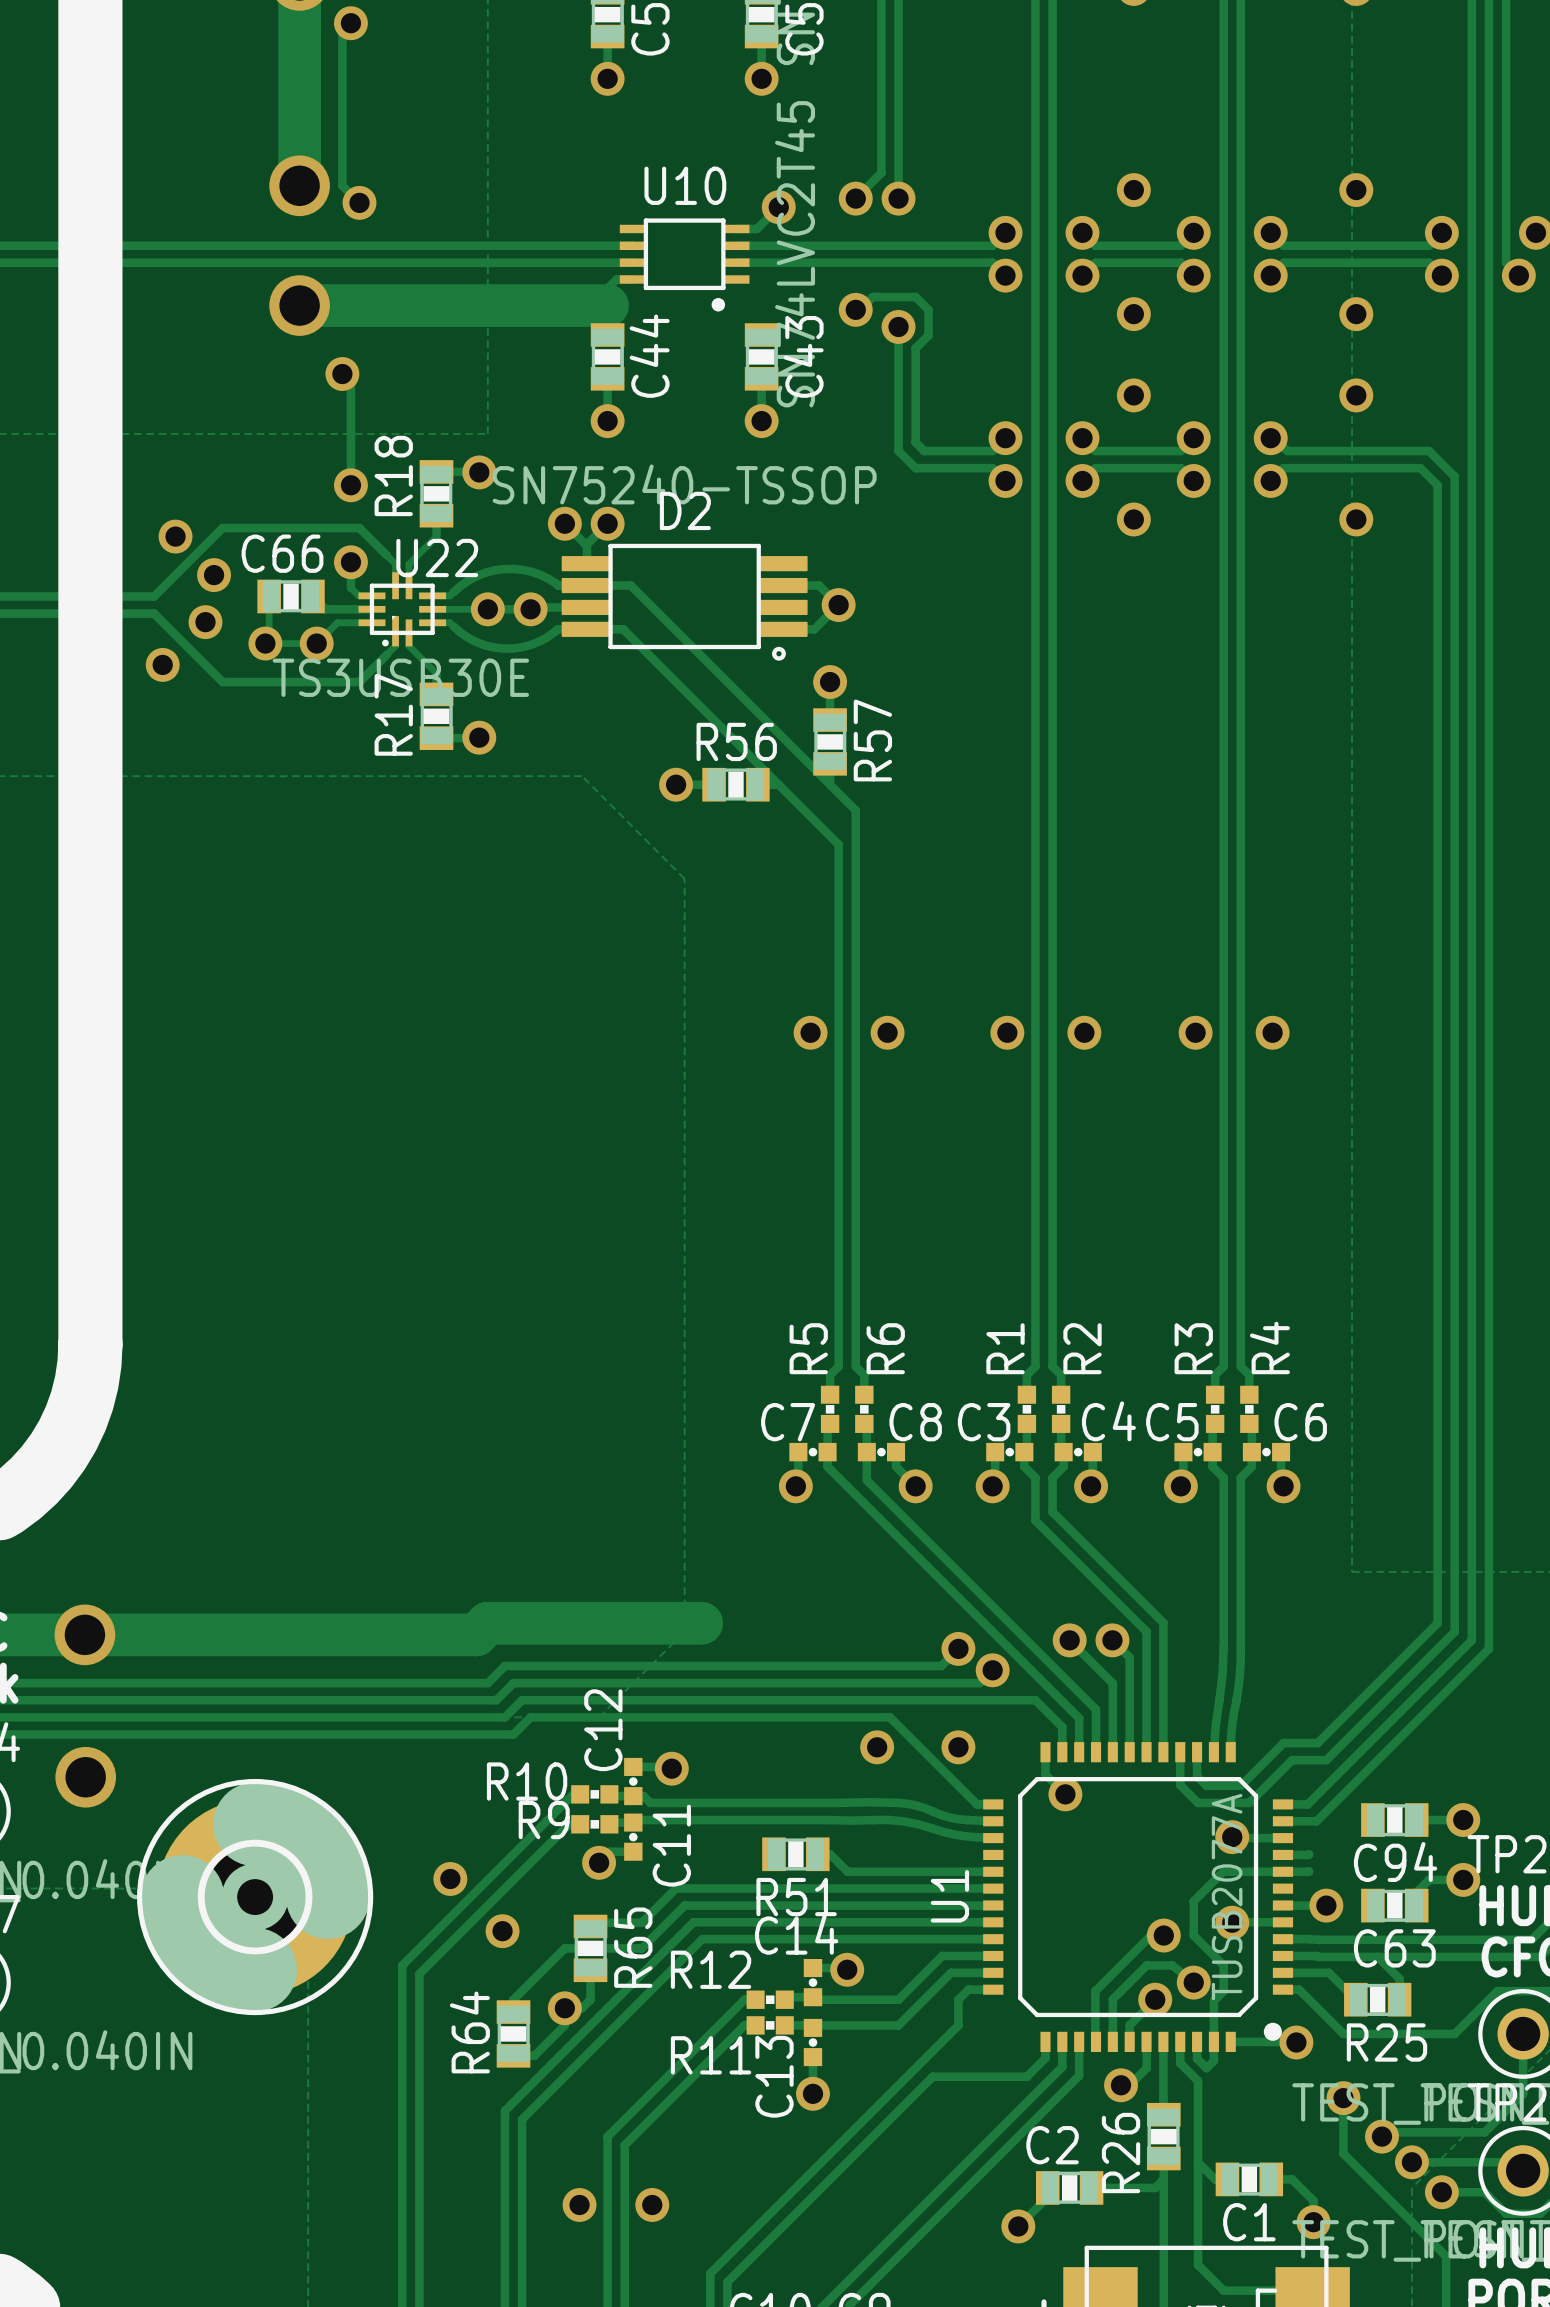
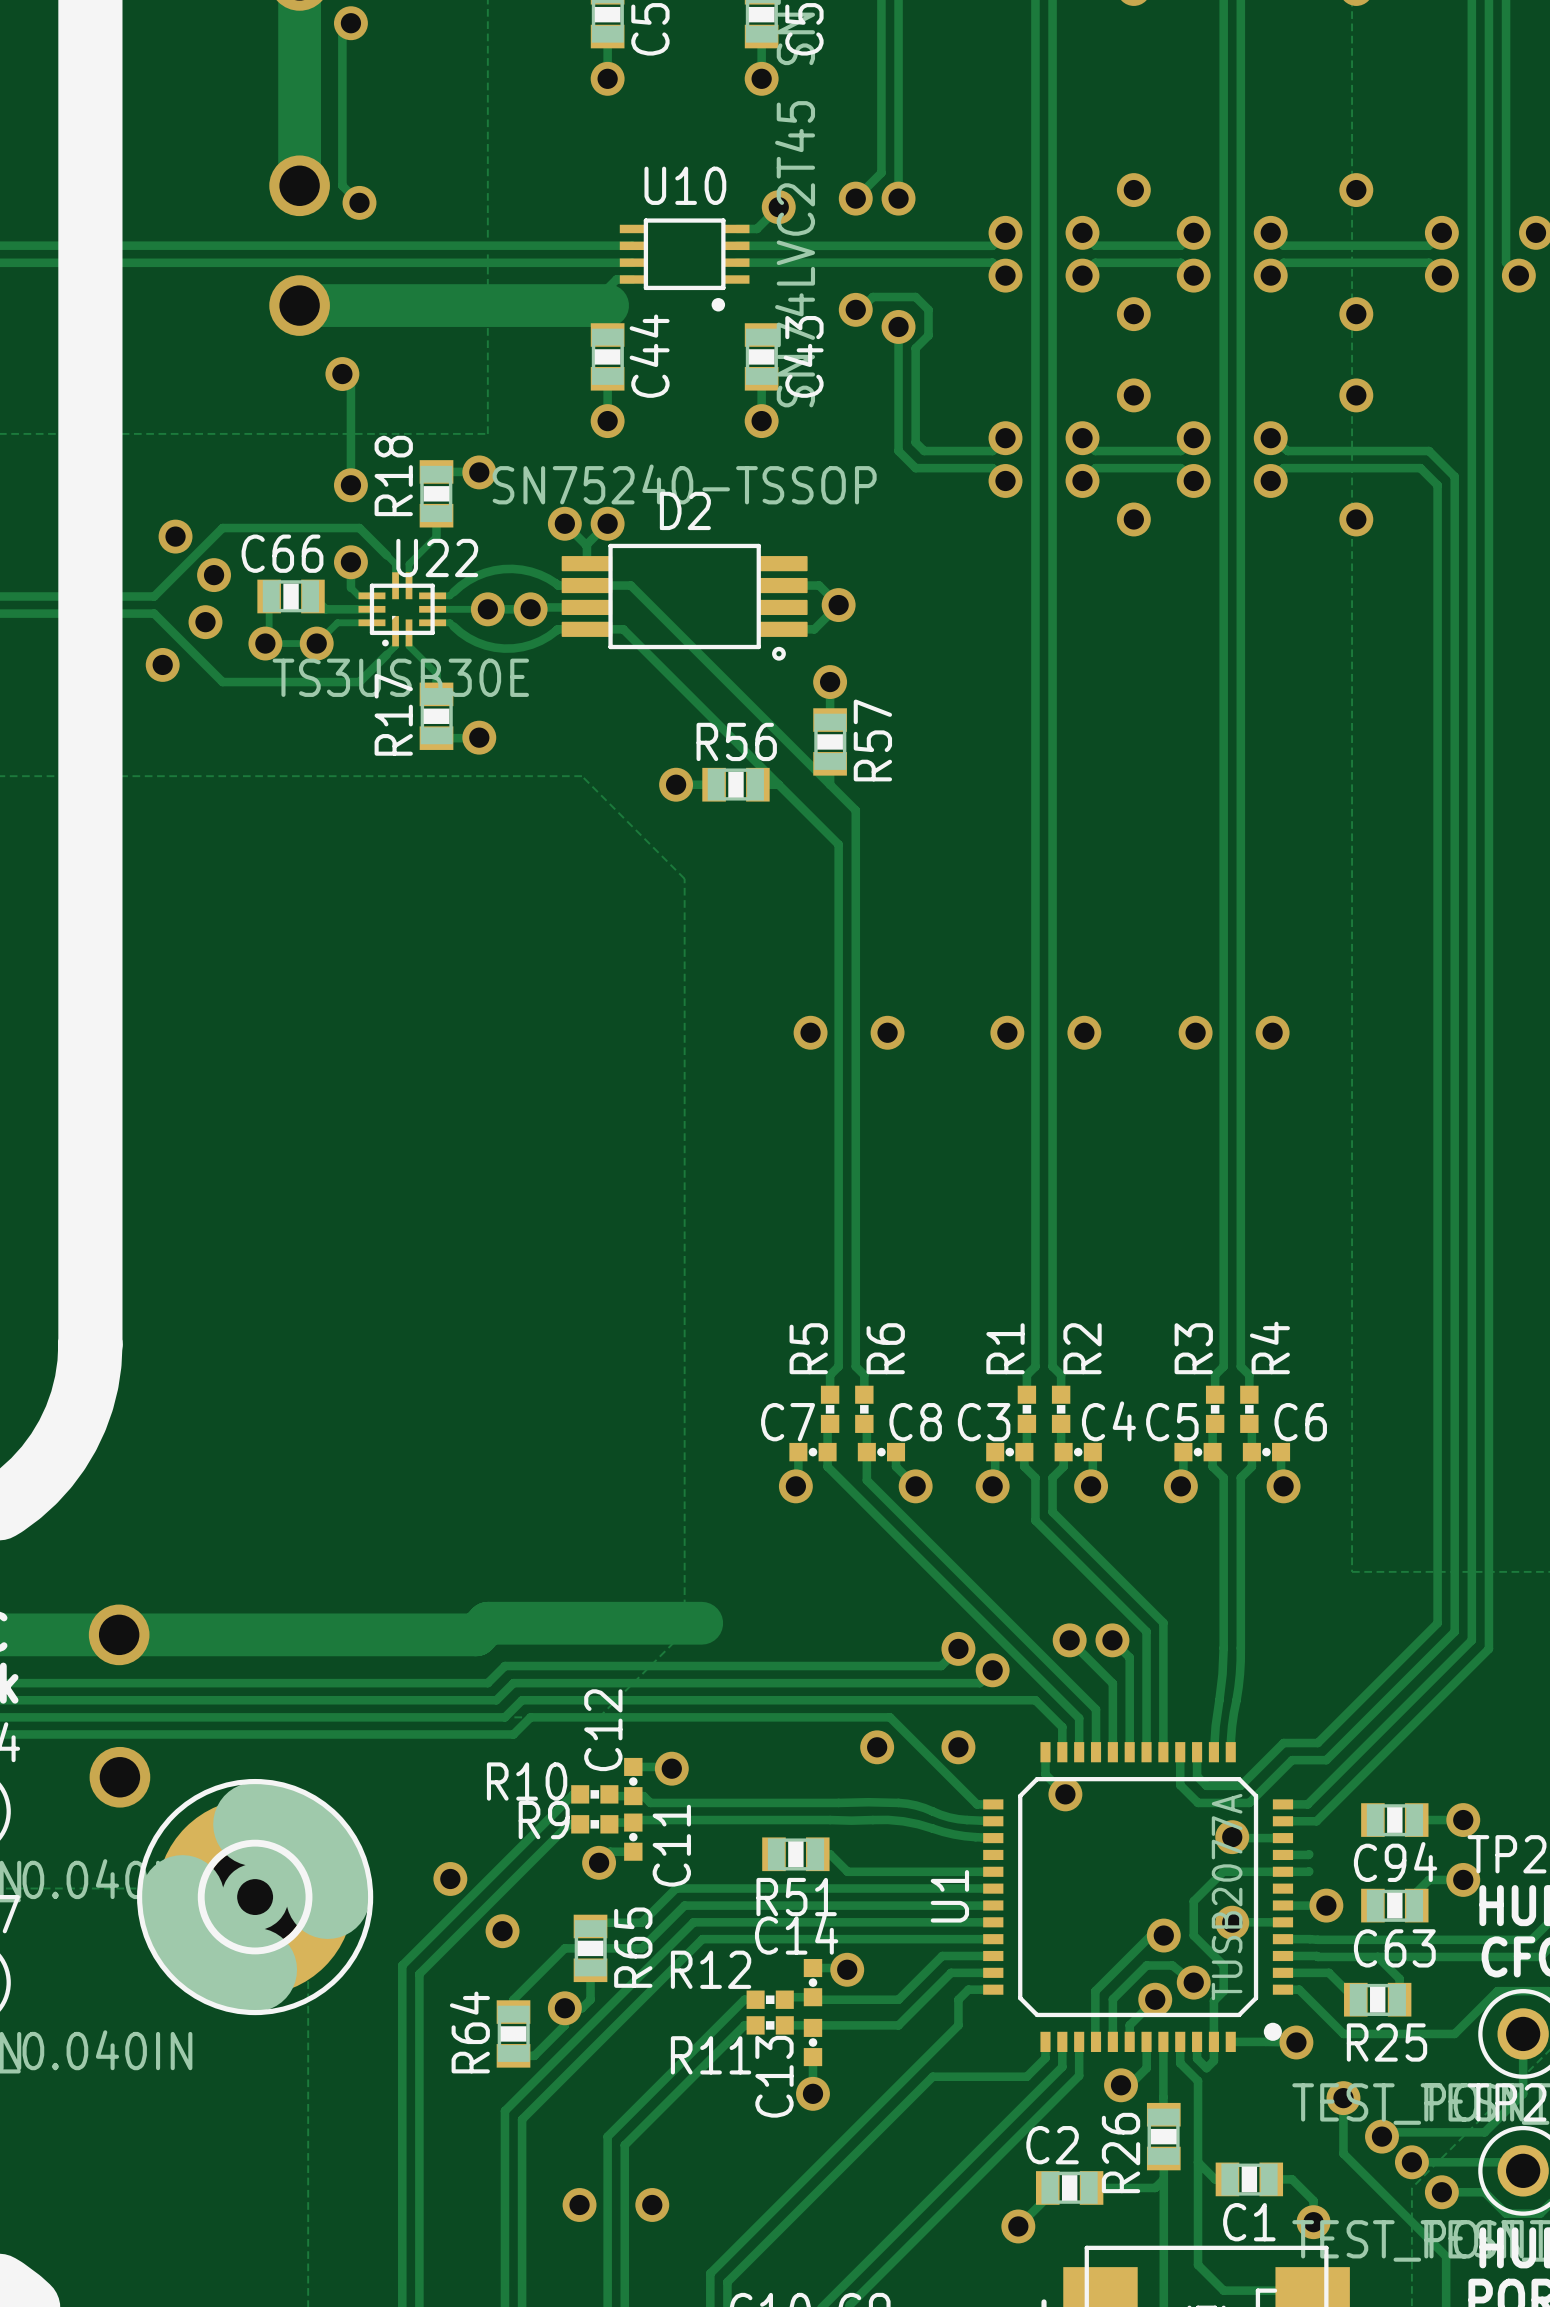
via position: (84, 1634) -> (119, 1634)
via position: (85, 1777) -> (119, 1777)

